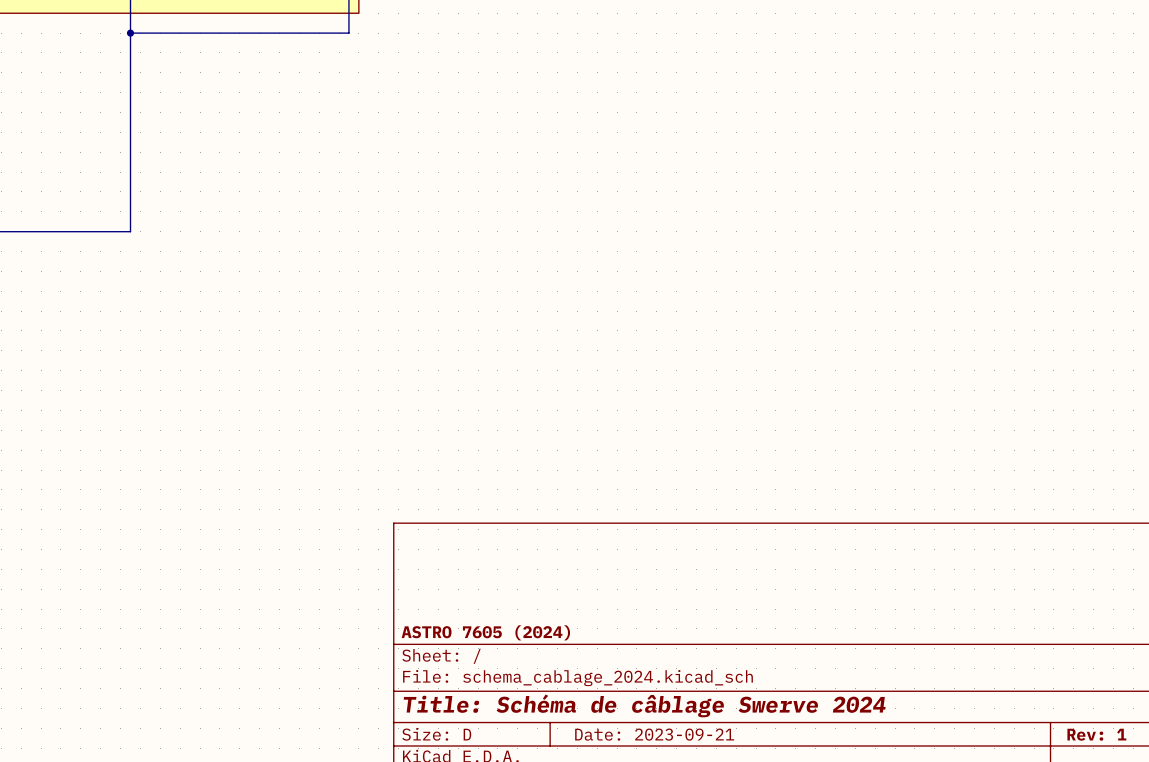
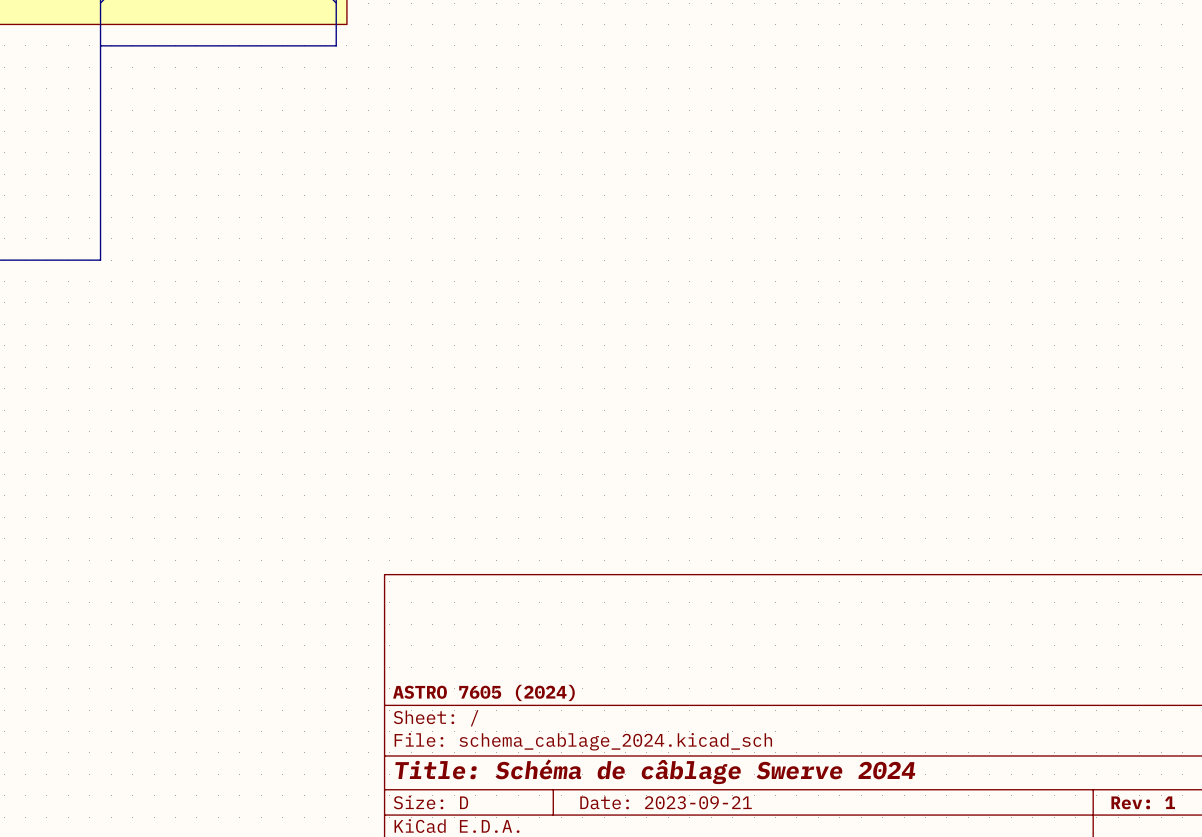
junction: (130, 33) -> none

